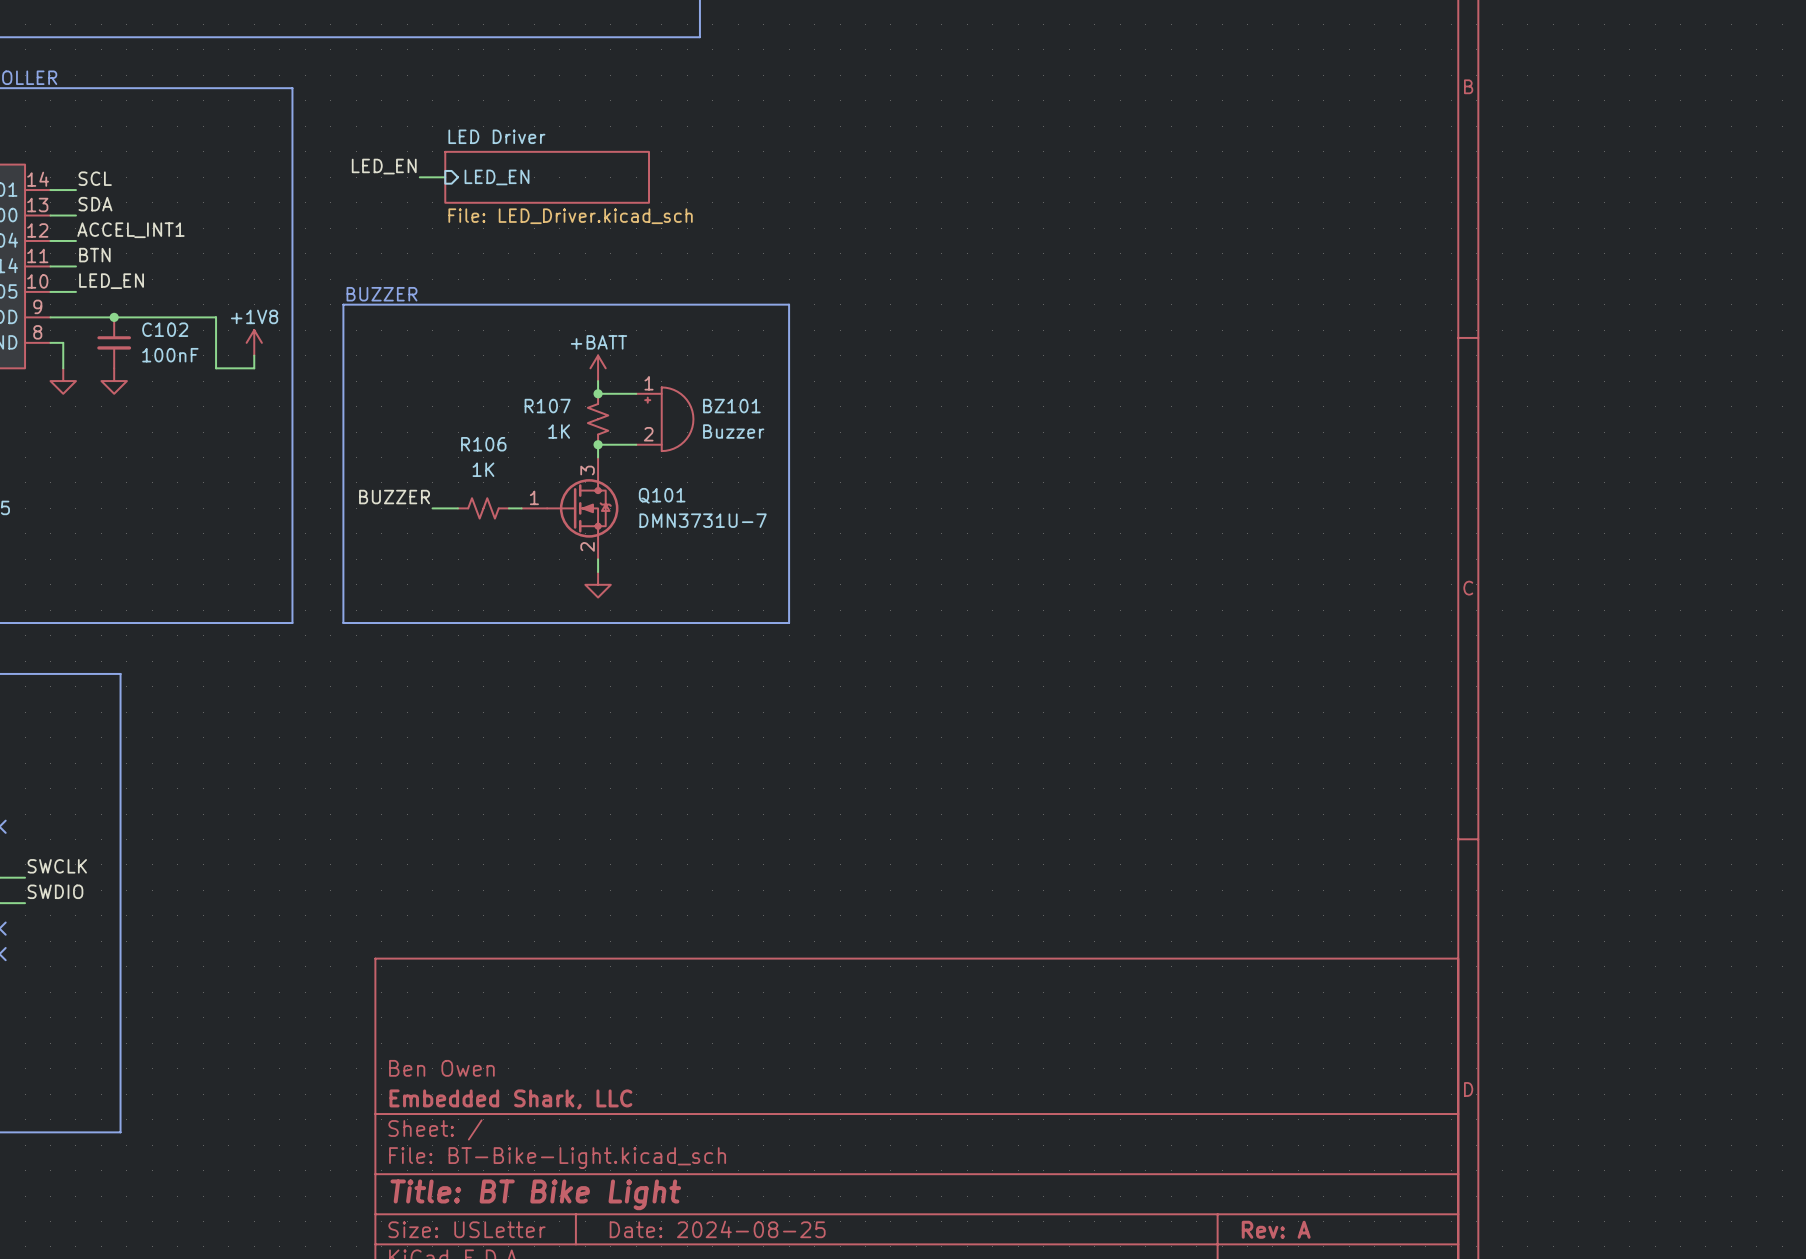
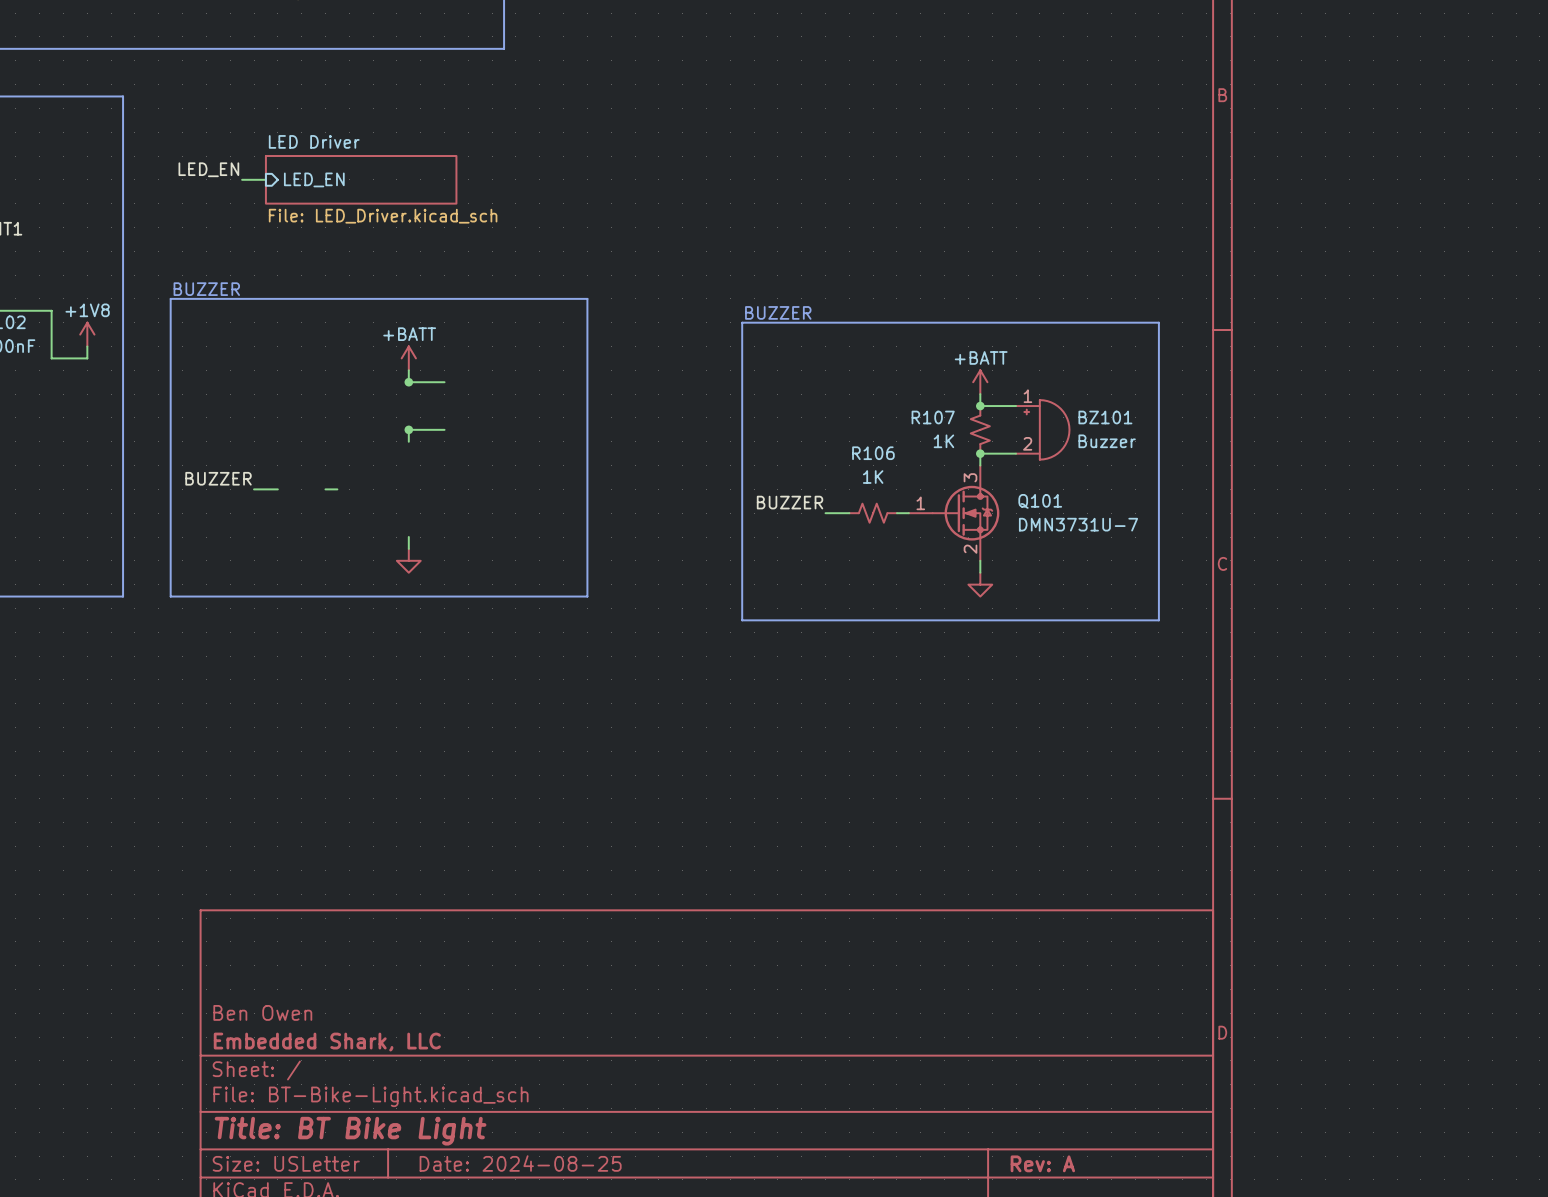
text: none -> BUZZER (778, 312)
line: none -> (742, 322) (1158, 322) (1158, 620) (742, 620) (742, 322)
power symbol: none -> +BATT (980, 382)
wire: none -> (980, 394) (980, 406) (1016, 406)
R107 position: (598, 419) -> (980, 429)
BZ101 position: (664, 419) -> (1042, 429)
junction: none -> (980, 406)
junction: none -> (980, 453)
wire: none -> (1016, 453) (980, 453) (980, 465)
R106 position: (483, 508) -> (873, 513)
Q101 position: (570, 508) -> (954, 513)
label: none -> BUZZER (790, 502)
wire: none -> (825, 513) (849, 513)
wire: none -> (896, 513) (908, 513)
wire: none -> (980, 560) (980, 572)
power symbol: none -> (980, 584)

